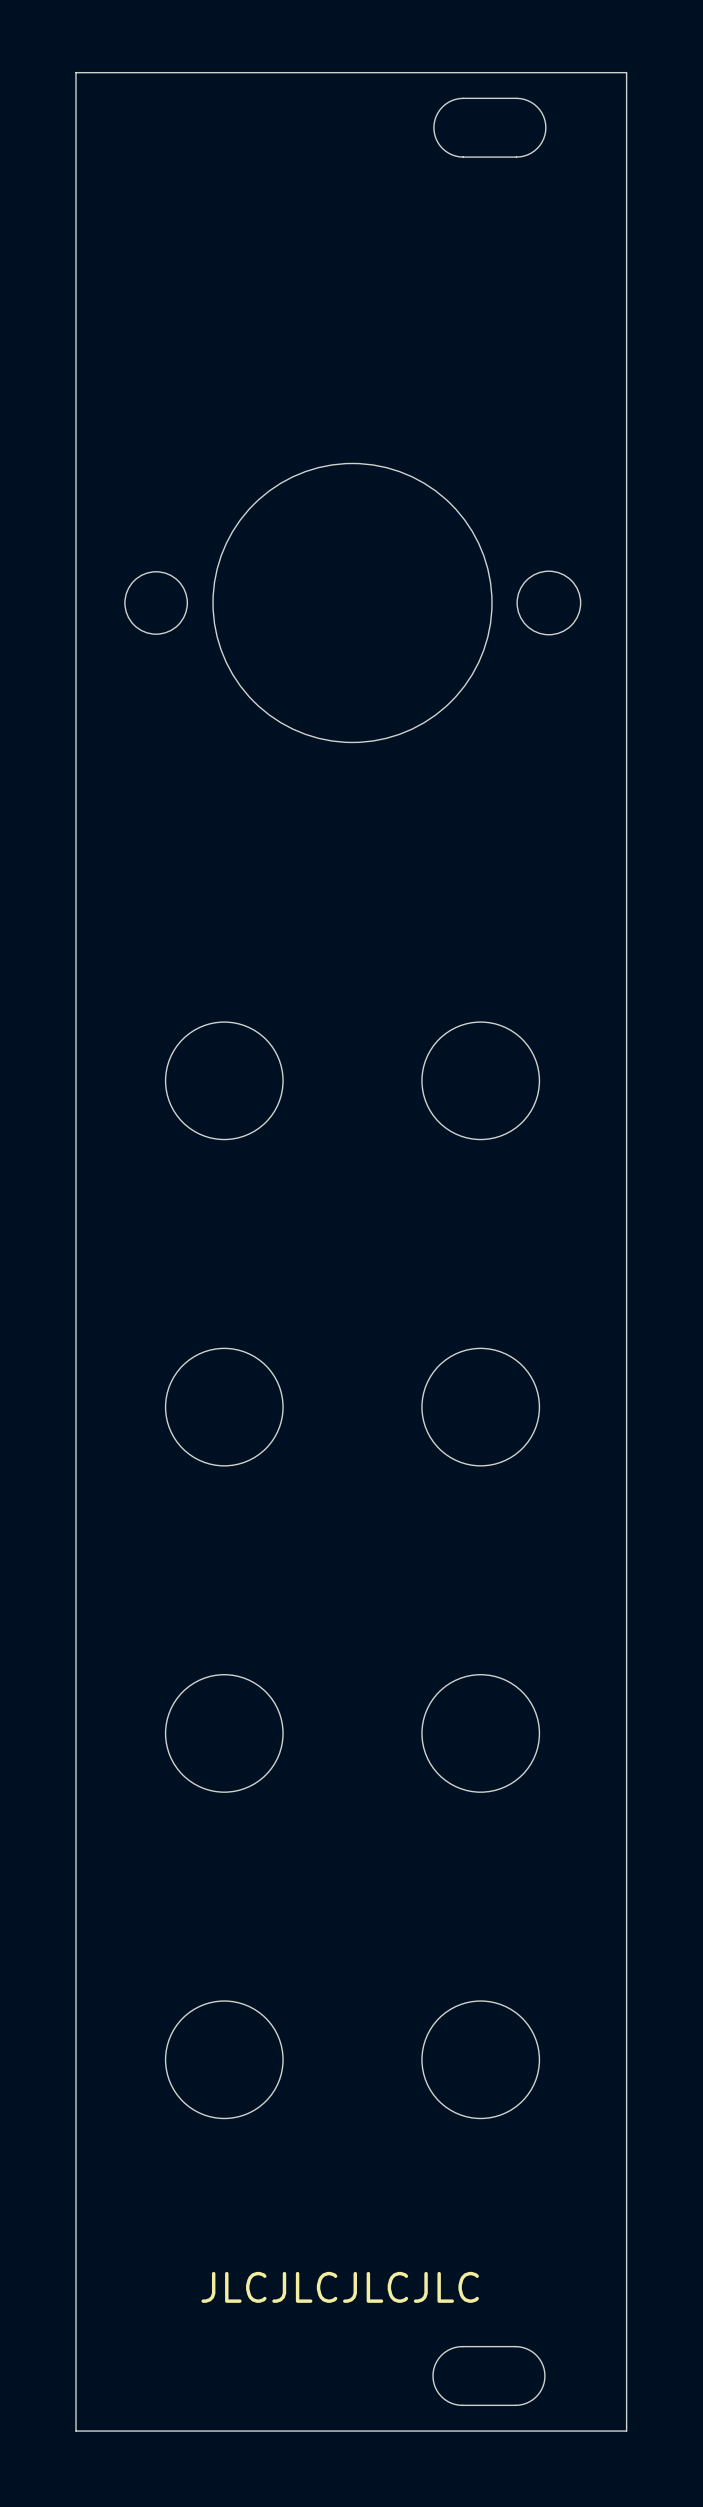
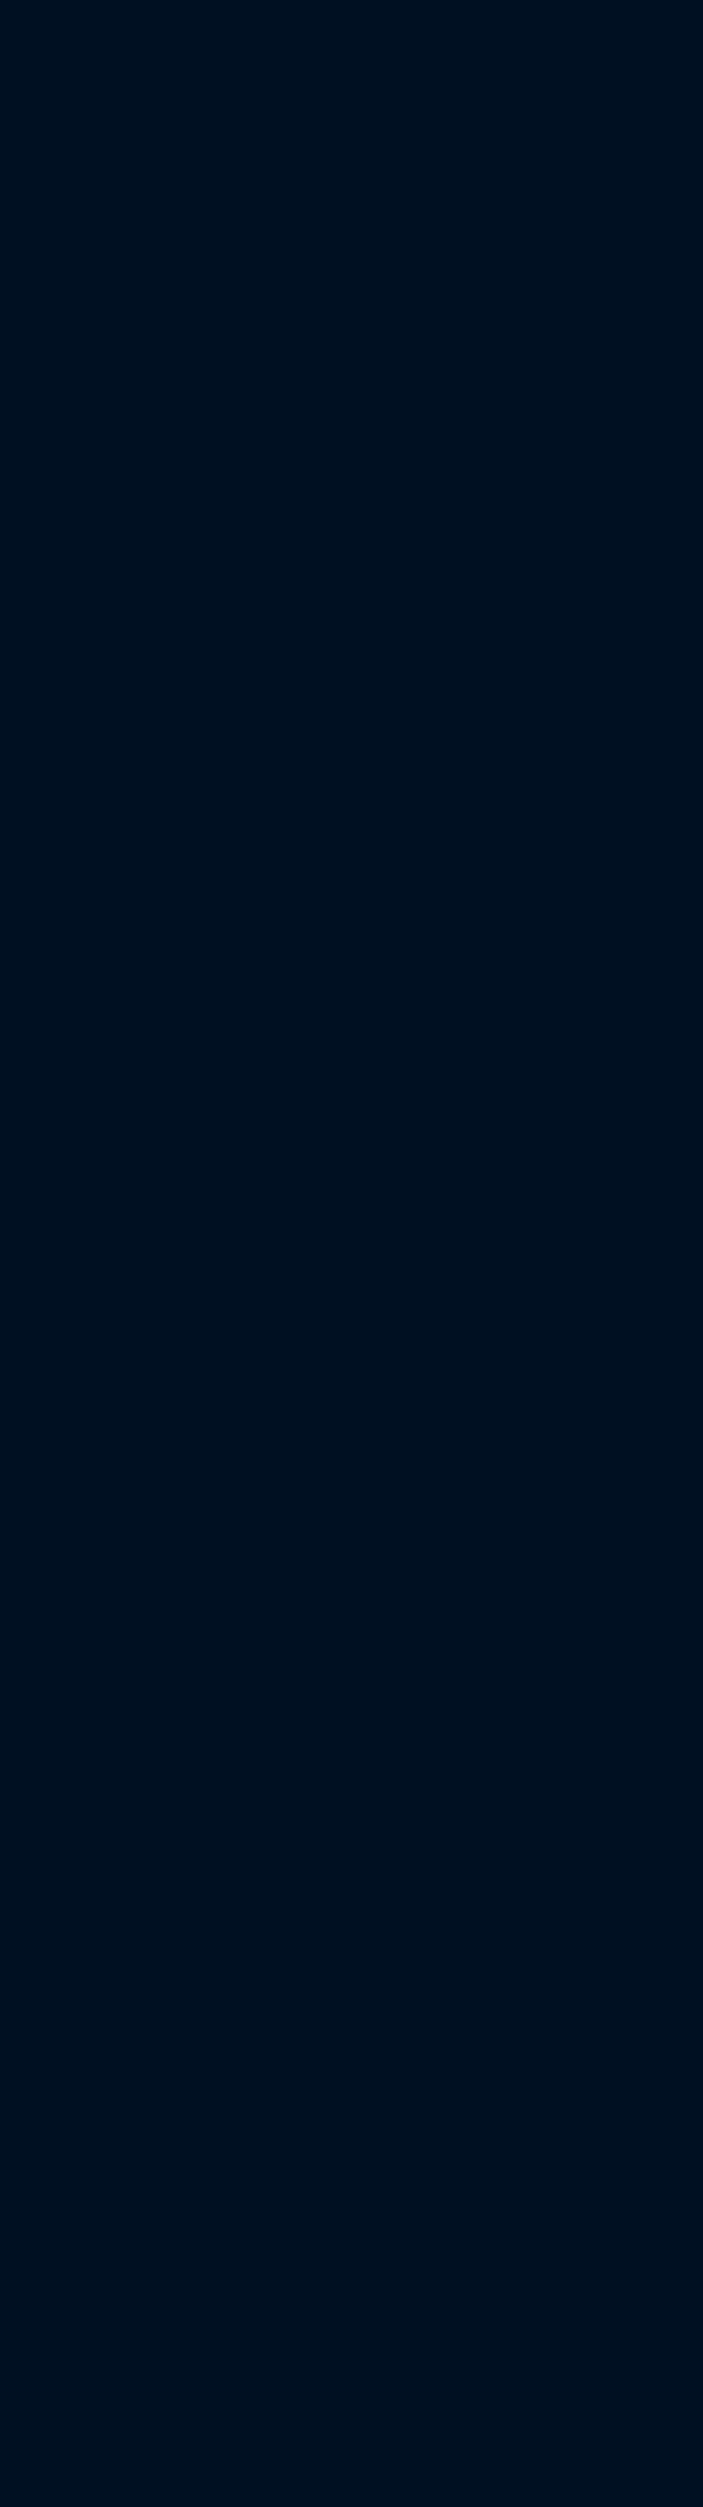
board edge: (626, 72) (76, 72) (76, 2431) (626, 2431) (626, 72) -> none
board edge: (516, 98) (463, 98) (448, 102) (439, 109) (434, 120) (434, 131) (437, 142) (448, 153) (459, 156) (516, 157) (531, 153) (543, 138) (544, 120) (534, 104) (516, 98) -> none
round board edge: [212, 463, 493, 743] -> none
round board edge: [516, 570, 582, 636] -> none
round board edge: [124, 571, 188, 635] -> none
round board edge: [165, 1021, 284, 1140] -> none
round board edge: [421, 1021, 540, 1140] -> none
round board edge: [165, 1347, 284, 1467] -> none
round board edge: [421, 1347, 540, 1467] -> none
round board edge: [165, 1674, 284, 1793] -> none
round board edge: [421, 1674, 540, 1793] -> none
round board edge: [165, 2000, 284, 2119] -> none
round board edge: [421, 2000, 540, 2119] -> none
text: JLCJLCJLCJLC (340, 2287) -> none
board edge: (515, 2346) (462, 2346) (447, 2350) (439, 2358) (433, 2368) (433, 2379) (436, 2390) (444, 2399) (458, 2405) (515, 2405) (529, 2401) (537, 2395) (543, 2386) (544, 2368) (535, 2354) (525, 2348) (515, 2346) -> none

